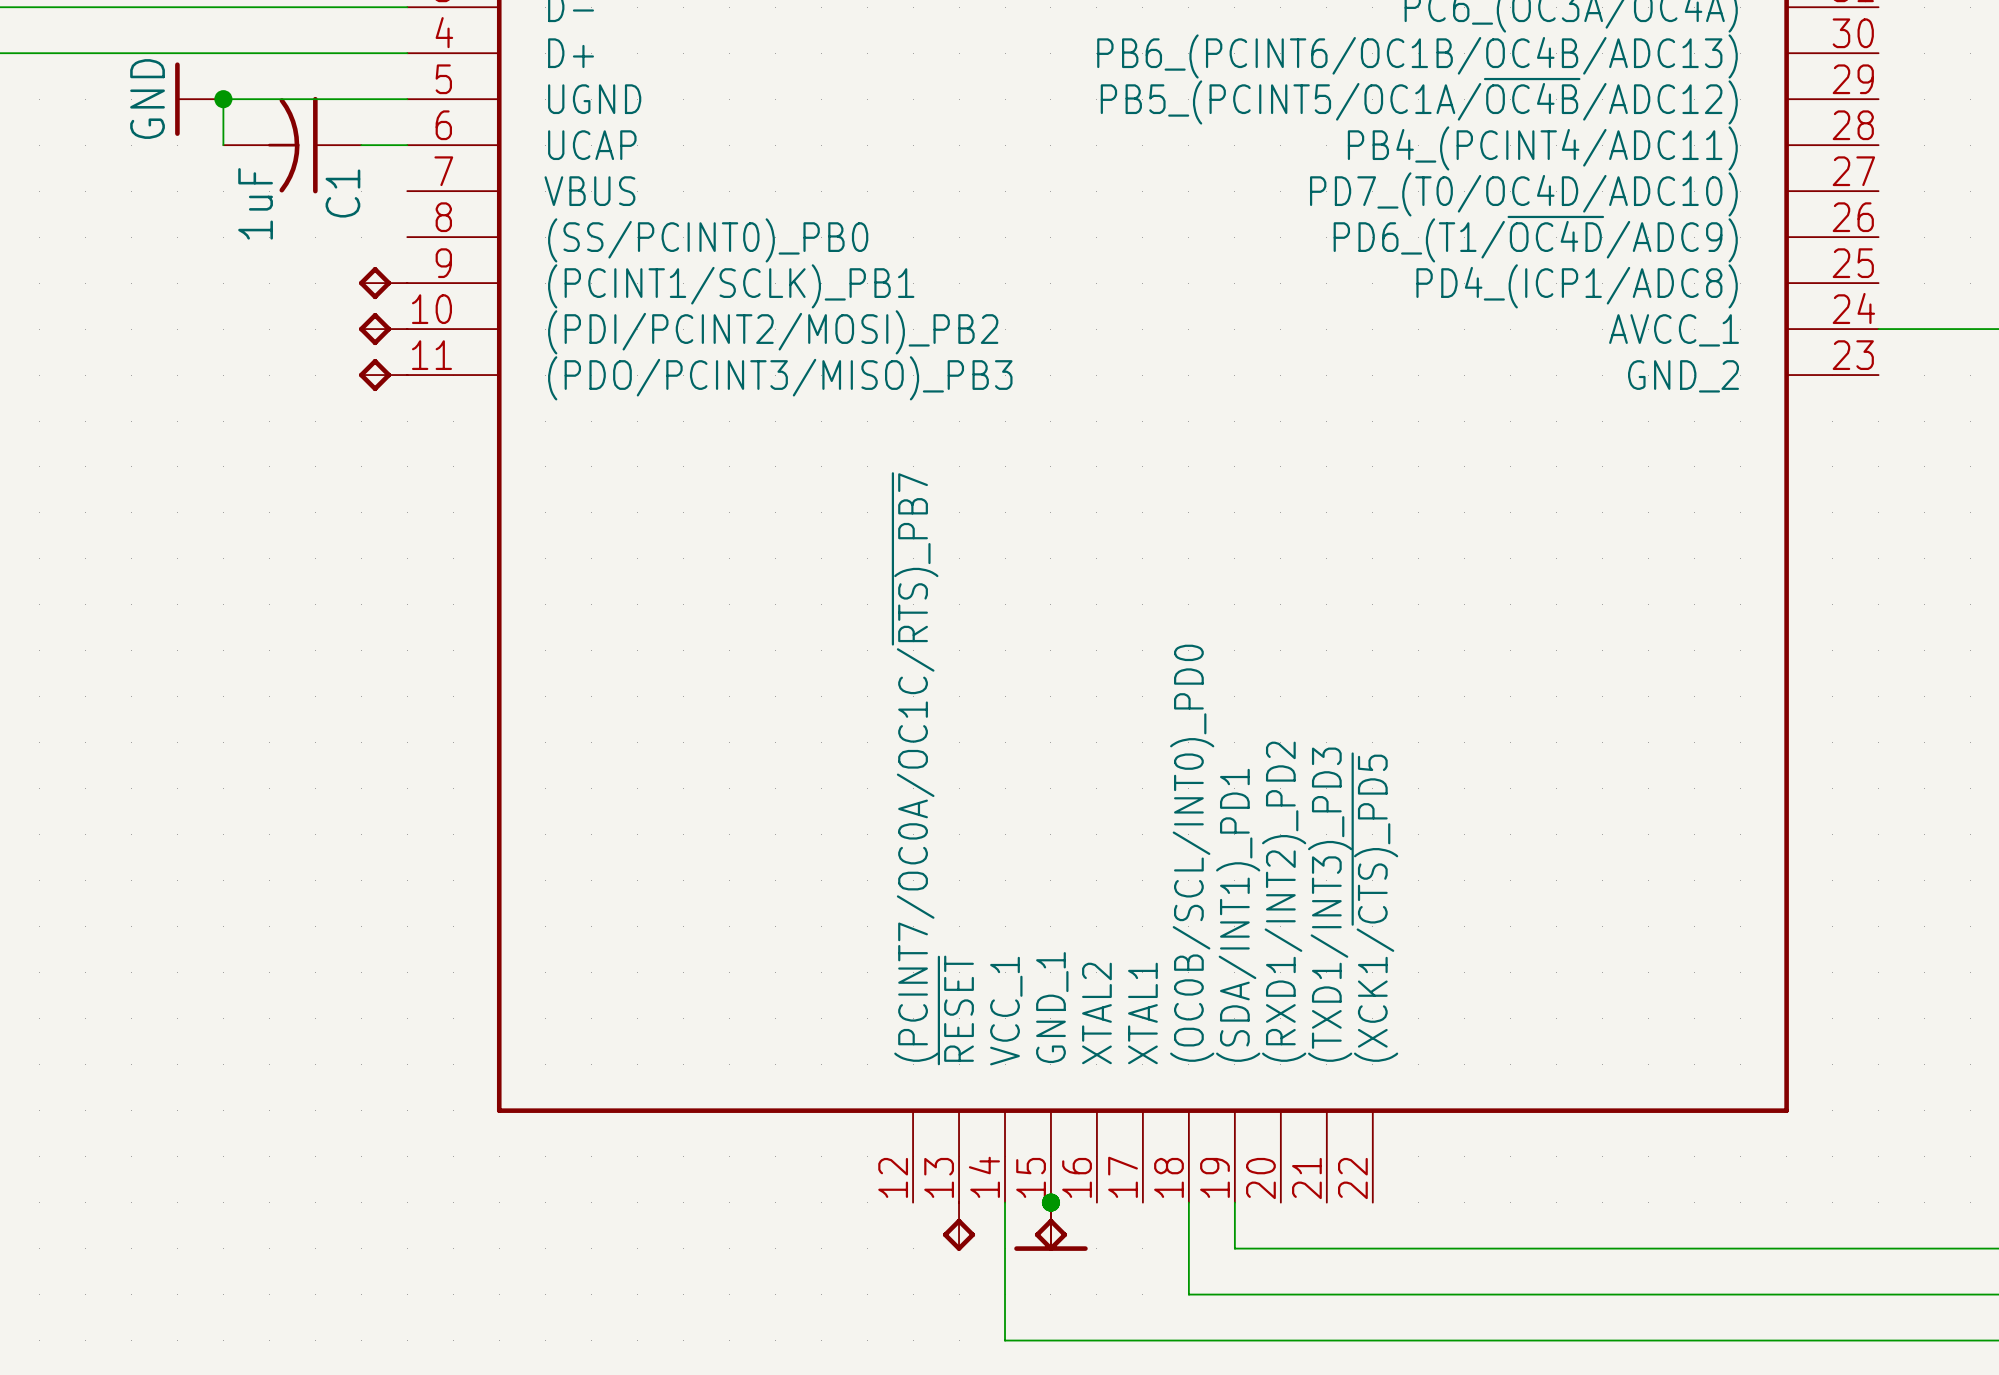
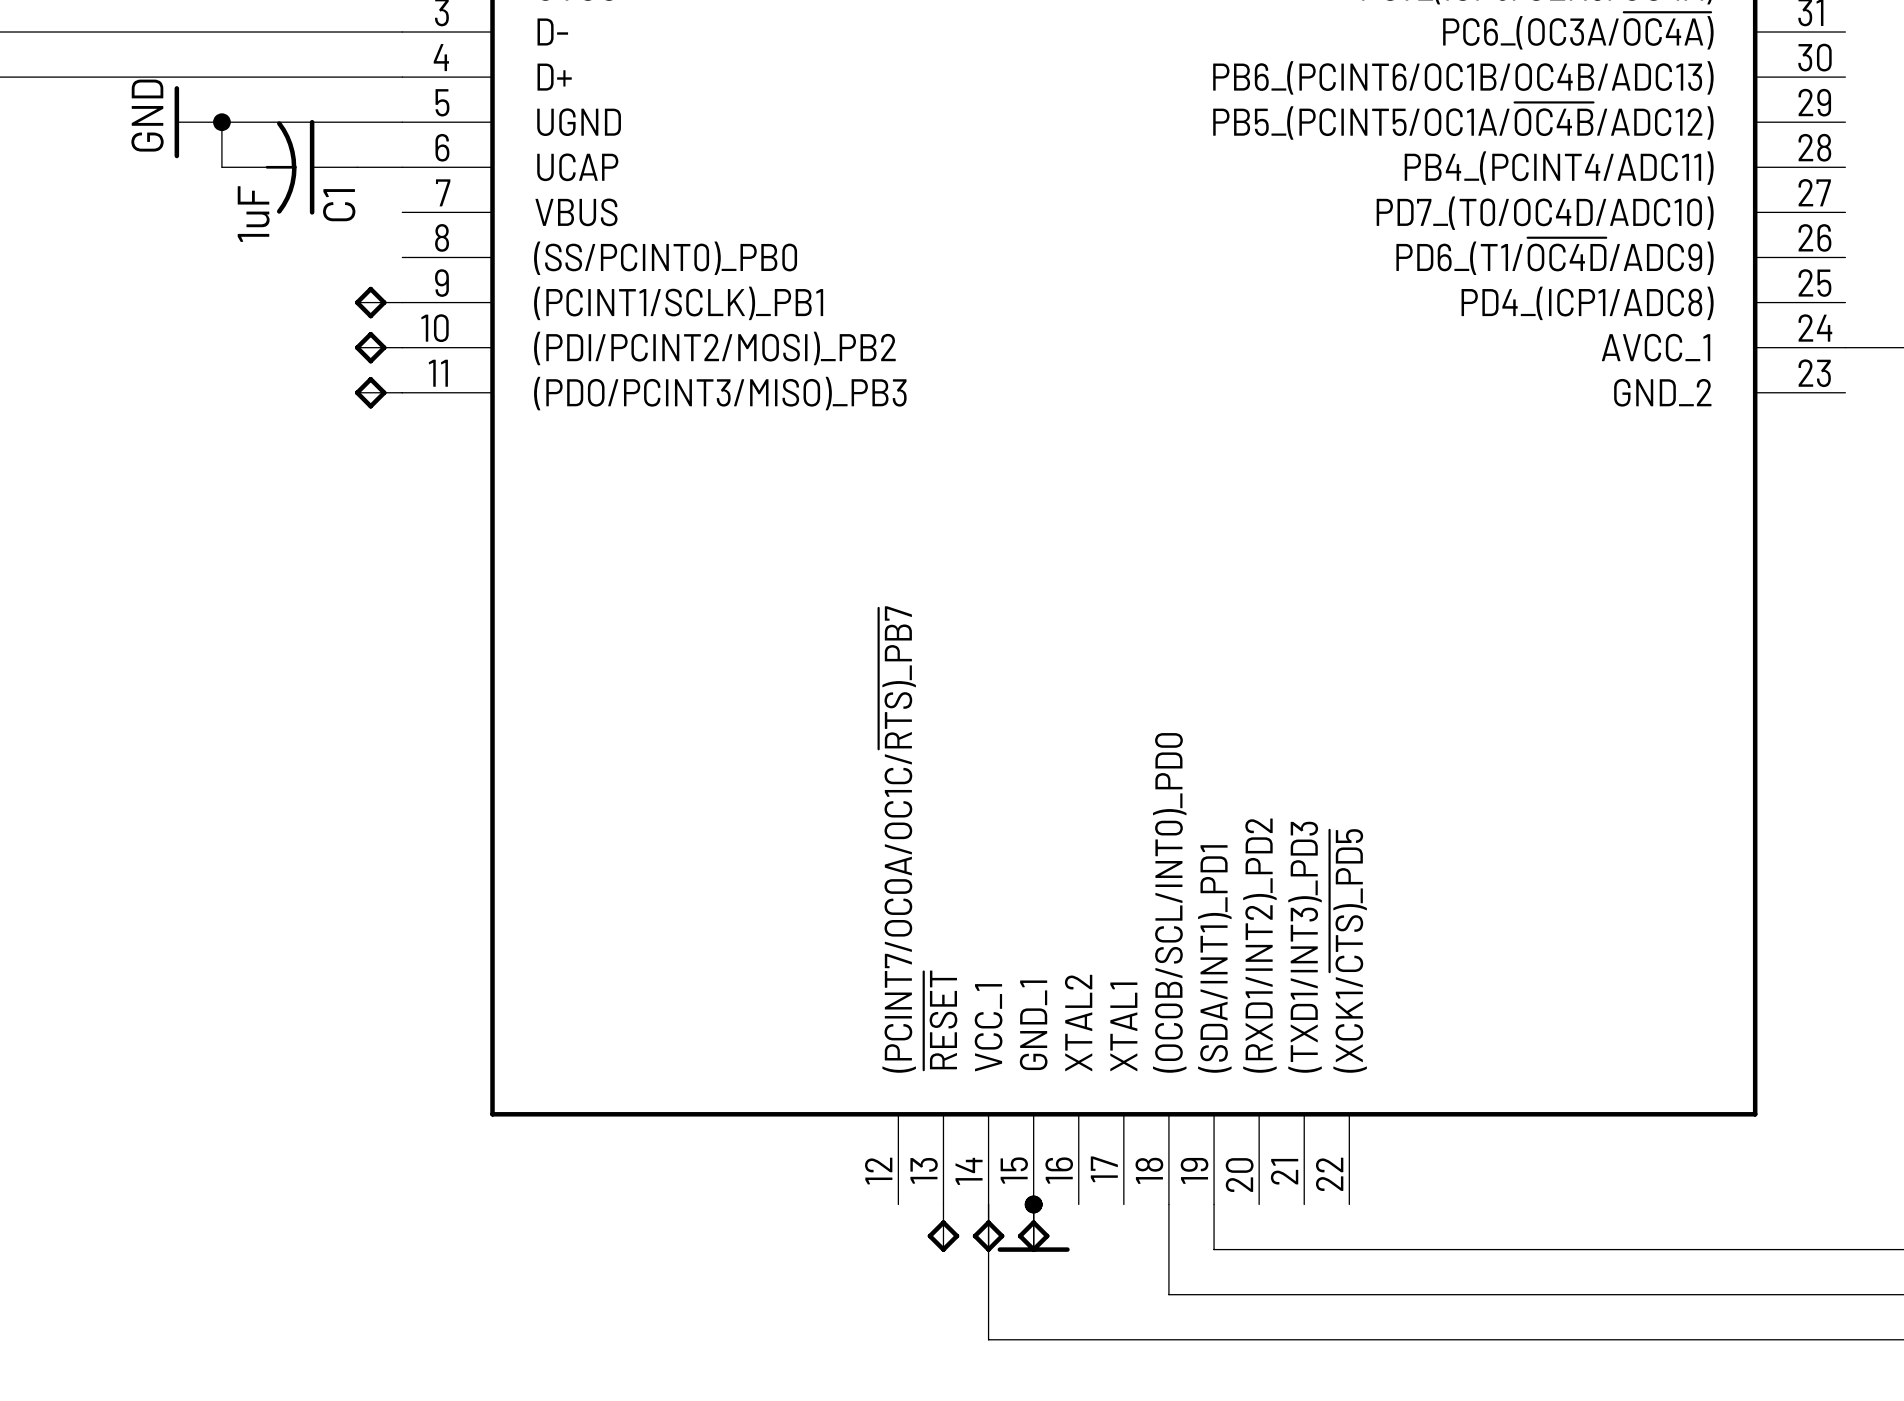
part: none -> (988, 1228)

